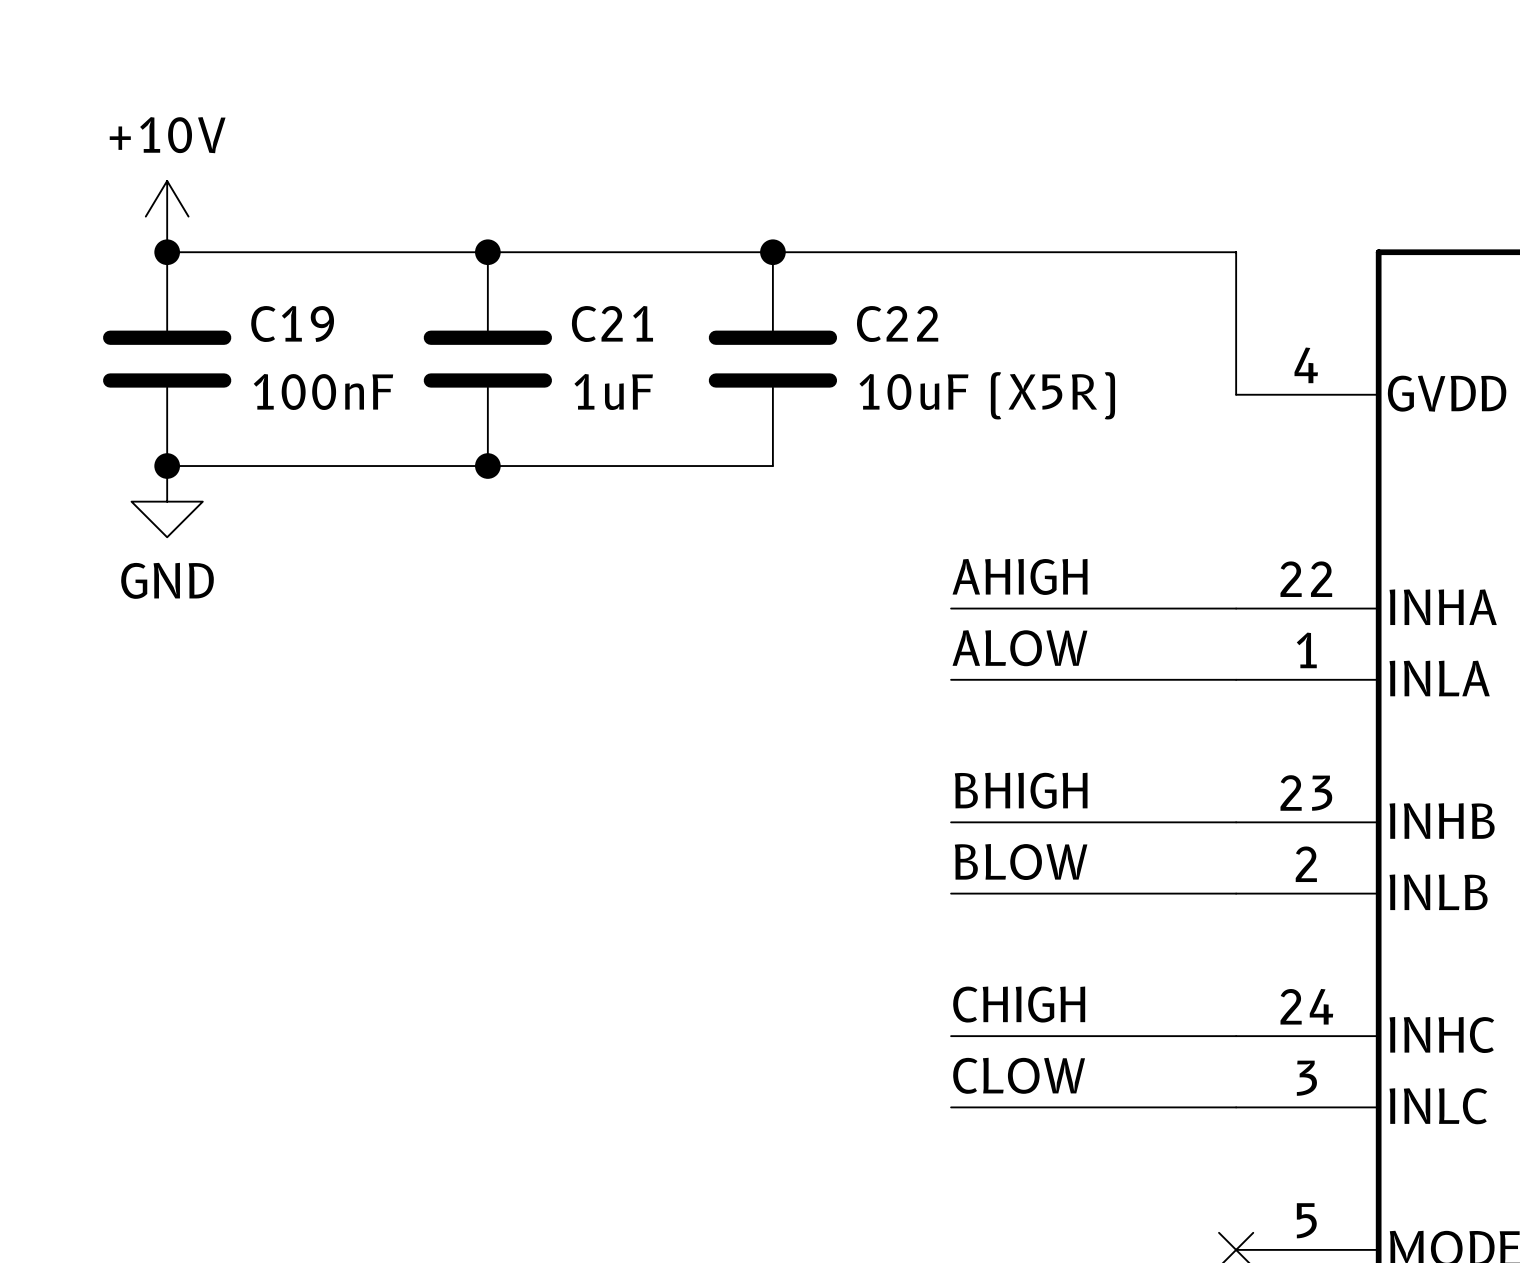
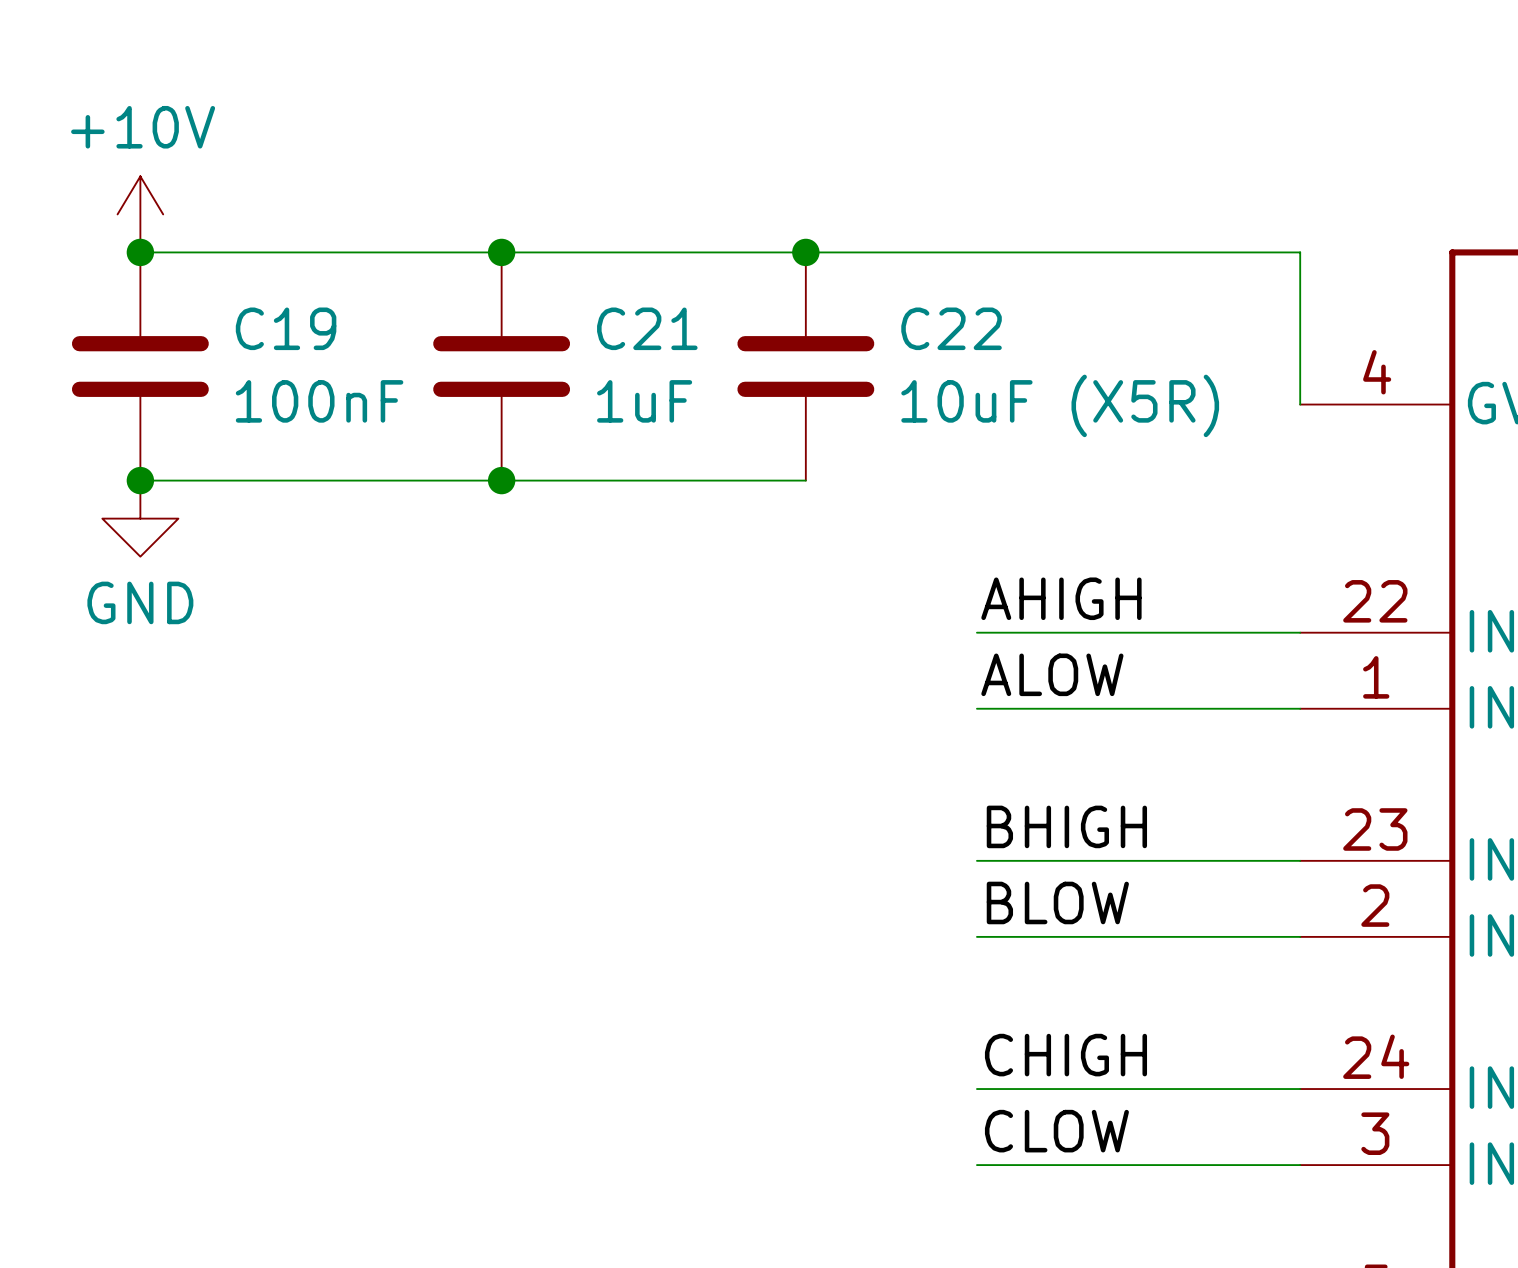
power symbol position: +10V (167, 216) -> +10V (140, 214)
junction position: (167, 252) -> (140, 252)
C19 position: (167, 359) -> (140, 366)
junction position: (167, 466) -> (140, 480)
power symbol position: GND (167, 501) -> GND (140, 518)
label position: AHIGH (1020, 576) -> AHIGH (1061, 598)
wire: none -> (976, 632) (995, 632)
label position: ALOW (1019, 648) -> ALOW (1052, 674)
wire: none -> (976, 708) (995, 708)
label position: BHIGH (1021, 790) -> BHIGH (1066, 826)
wire: none -> (976, 860) (995, 860)
label position: BLOW (1021, 862) -> BLOW (1057, 902)
wire: none -> (976, 936) (995, 936)
label position: CHIGH (1019, 1004) -> CHIGH (1065, 1055)
wire: none -> (976, 1089) (995, 1089)
label position: CLOW (1019, 1075) -> CLOW (1056, 1131)
wire: none -> (976, 1165) (995, 1165)

